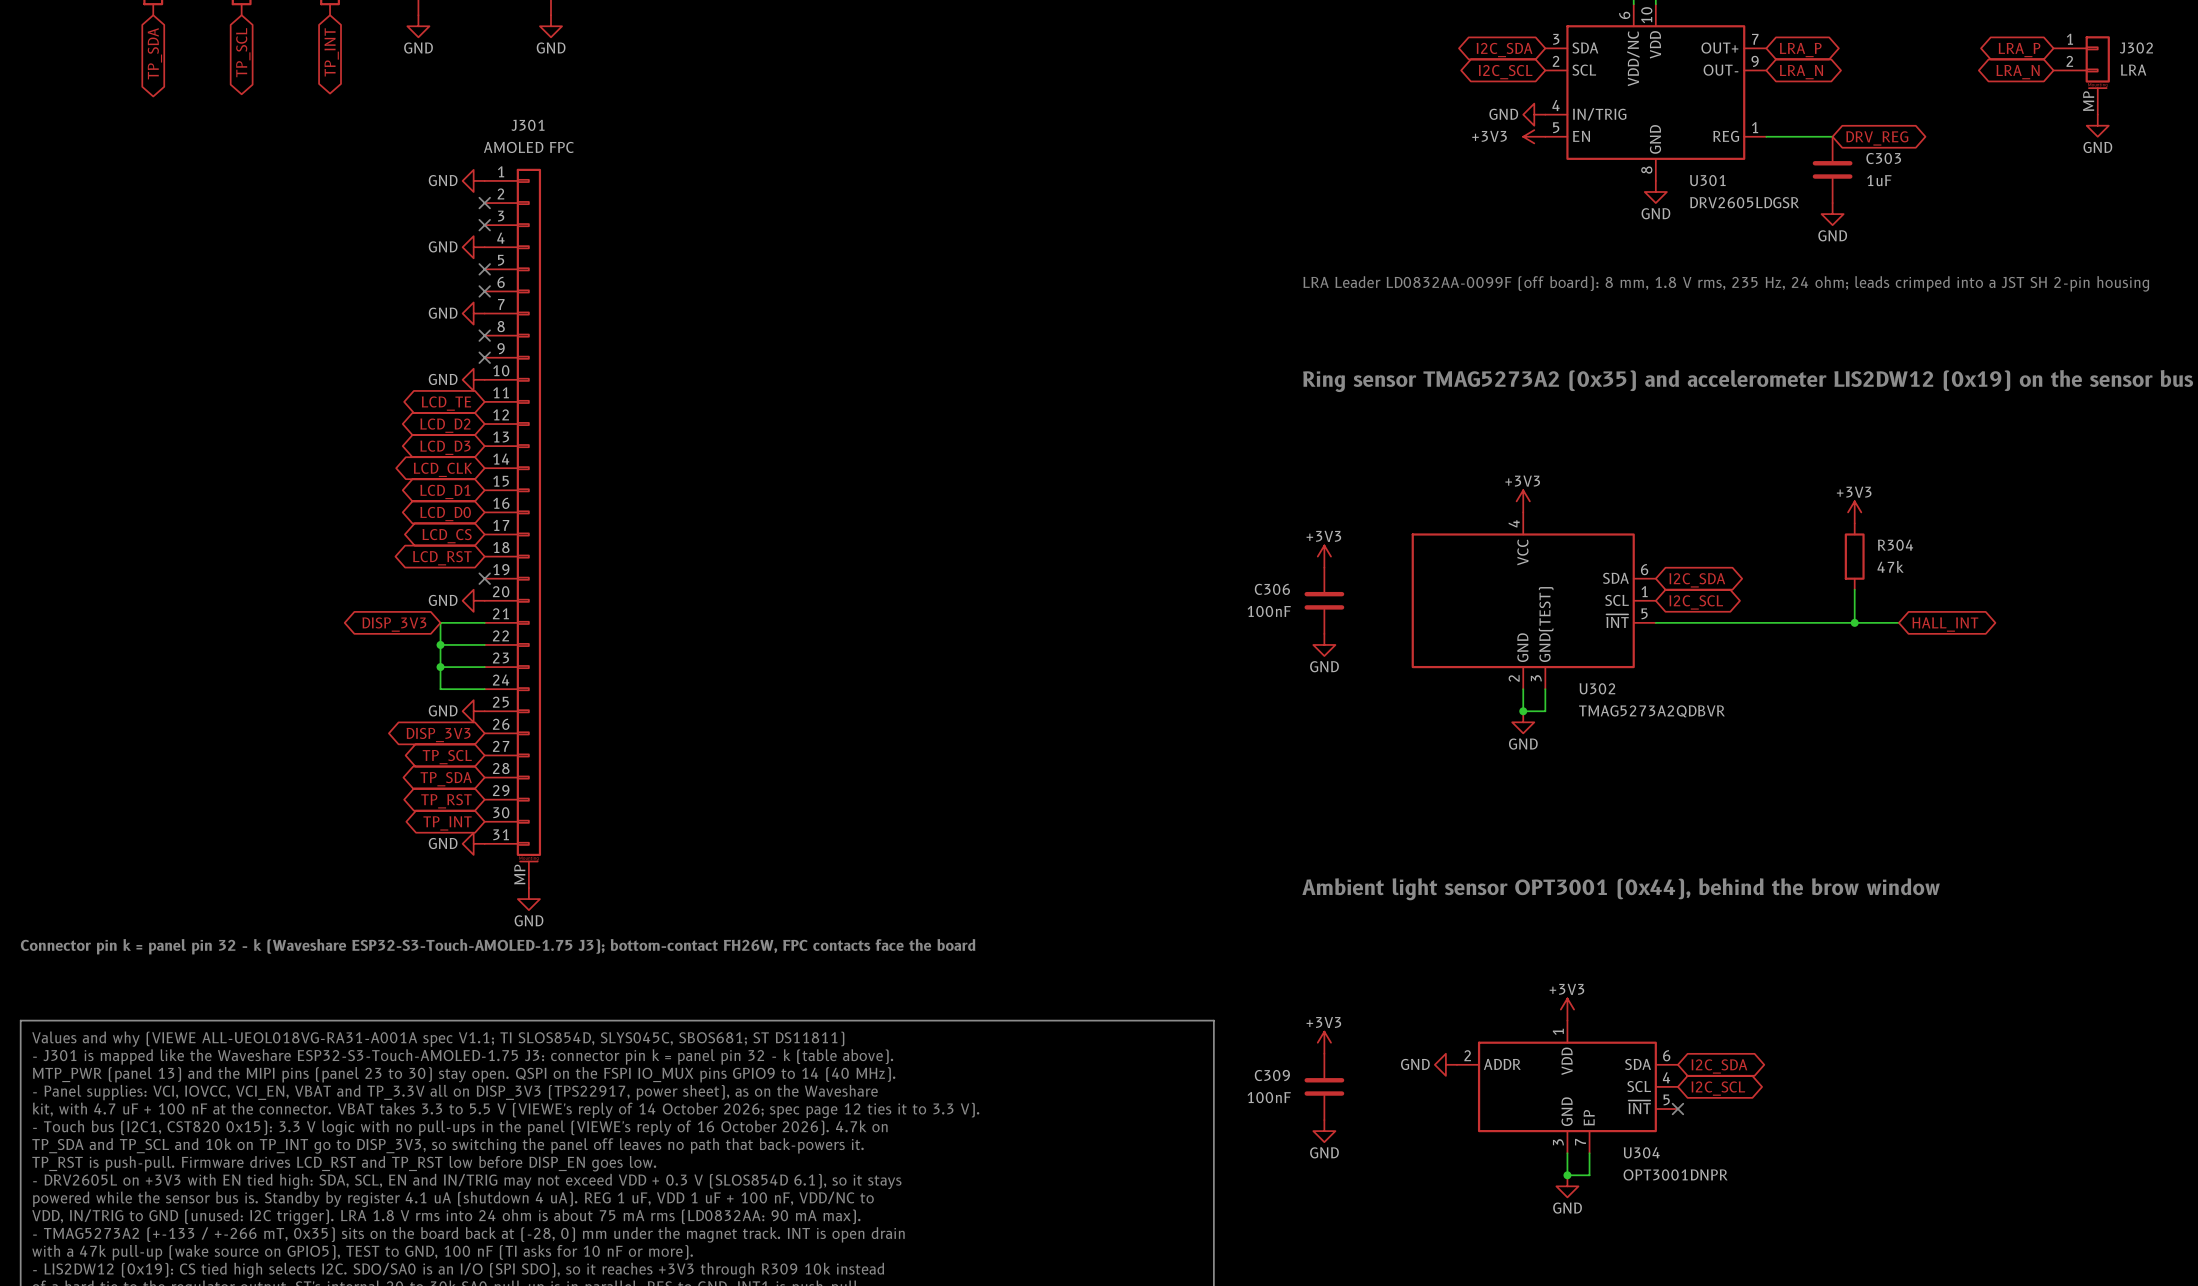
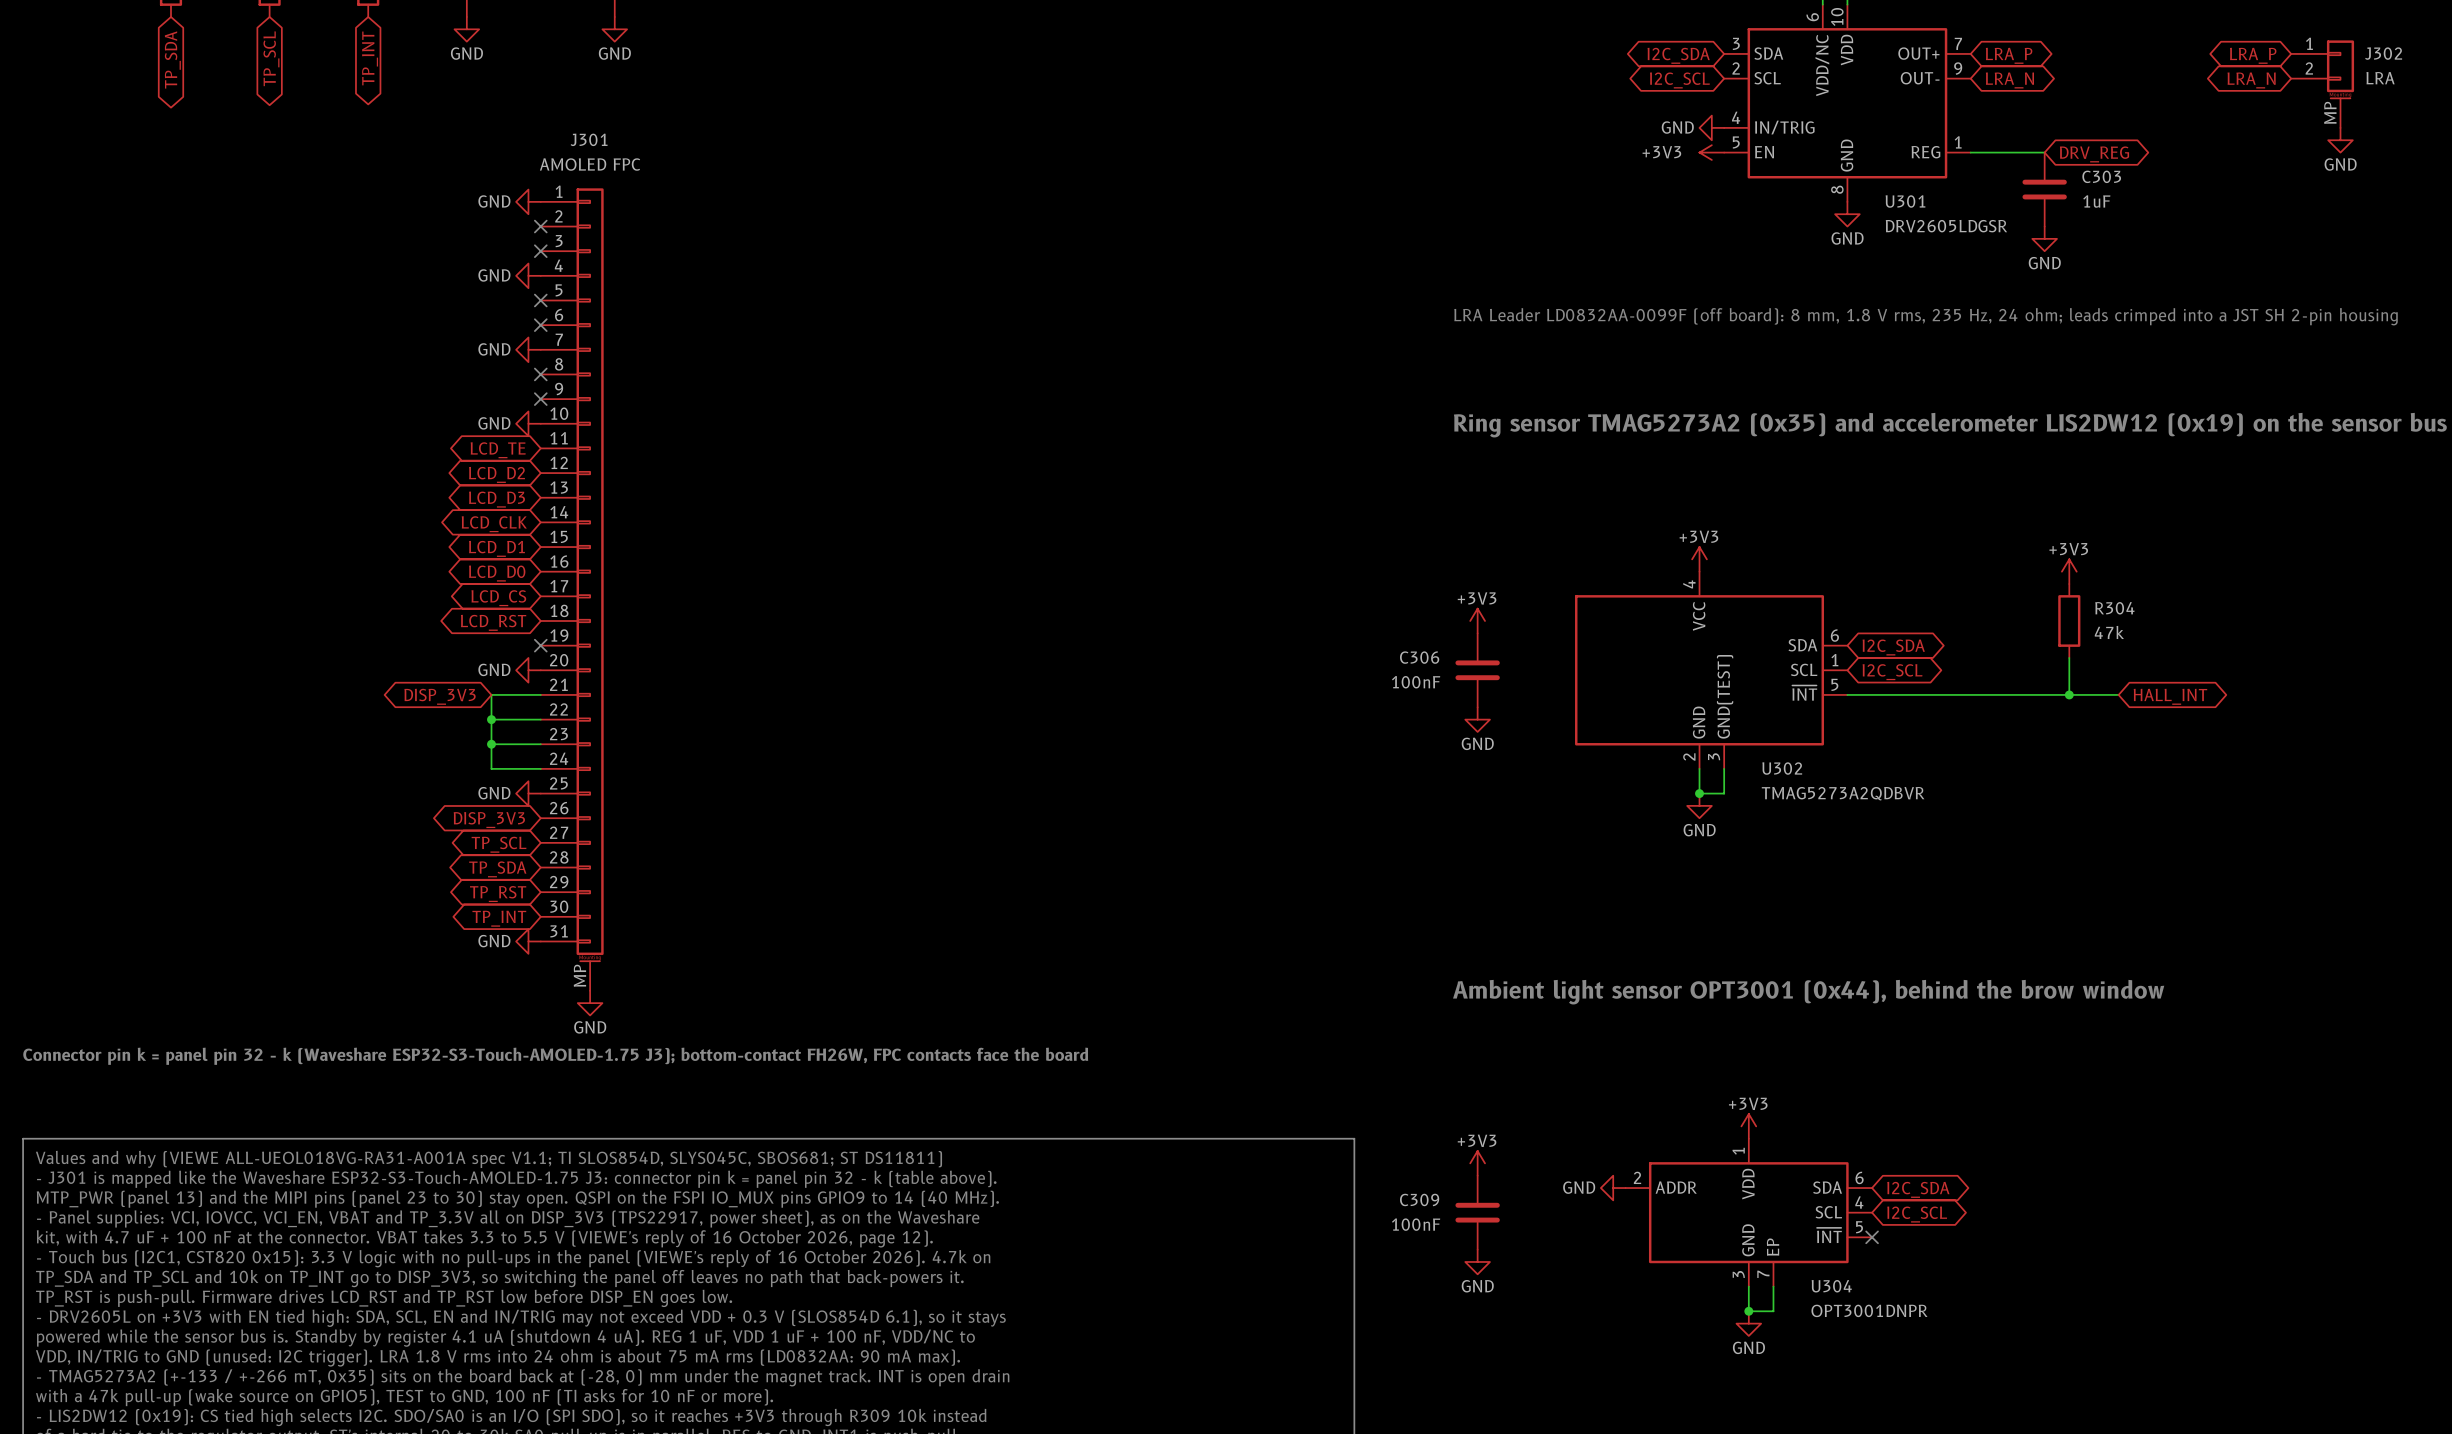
text: kit, with 4.7 uF + 100 nF at the connector. VBAT takes 3.3 to 5.5 V (VIEWE's reply of 14 October 2026; spec page 12 ties it to 3.3 V). (506, 1110) -> kit, with 4.7 uF + 100 nF at the connector. VBAT takes 3.3 to 5.5 V (VIEWE's reply of 16 October 2026, page 12). (484, 1238)

